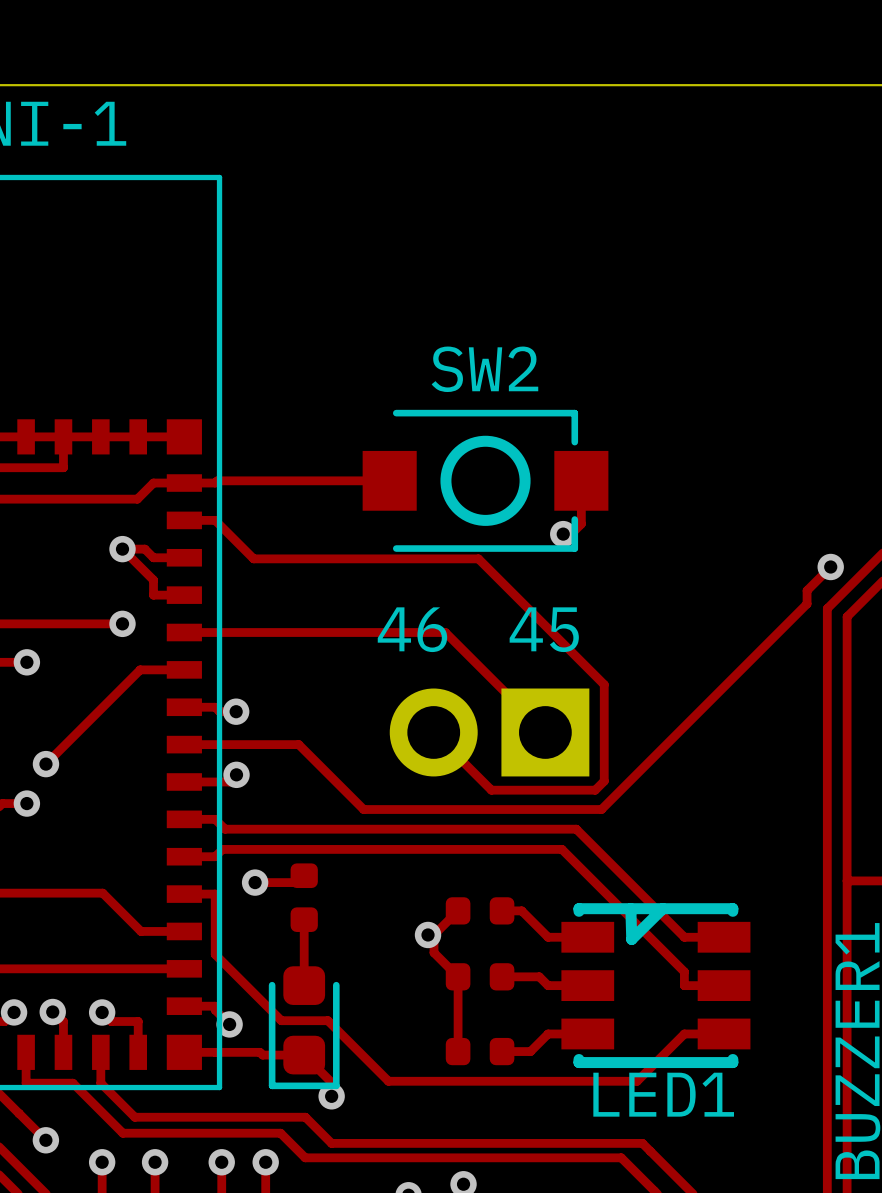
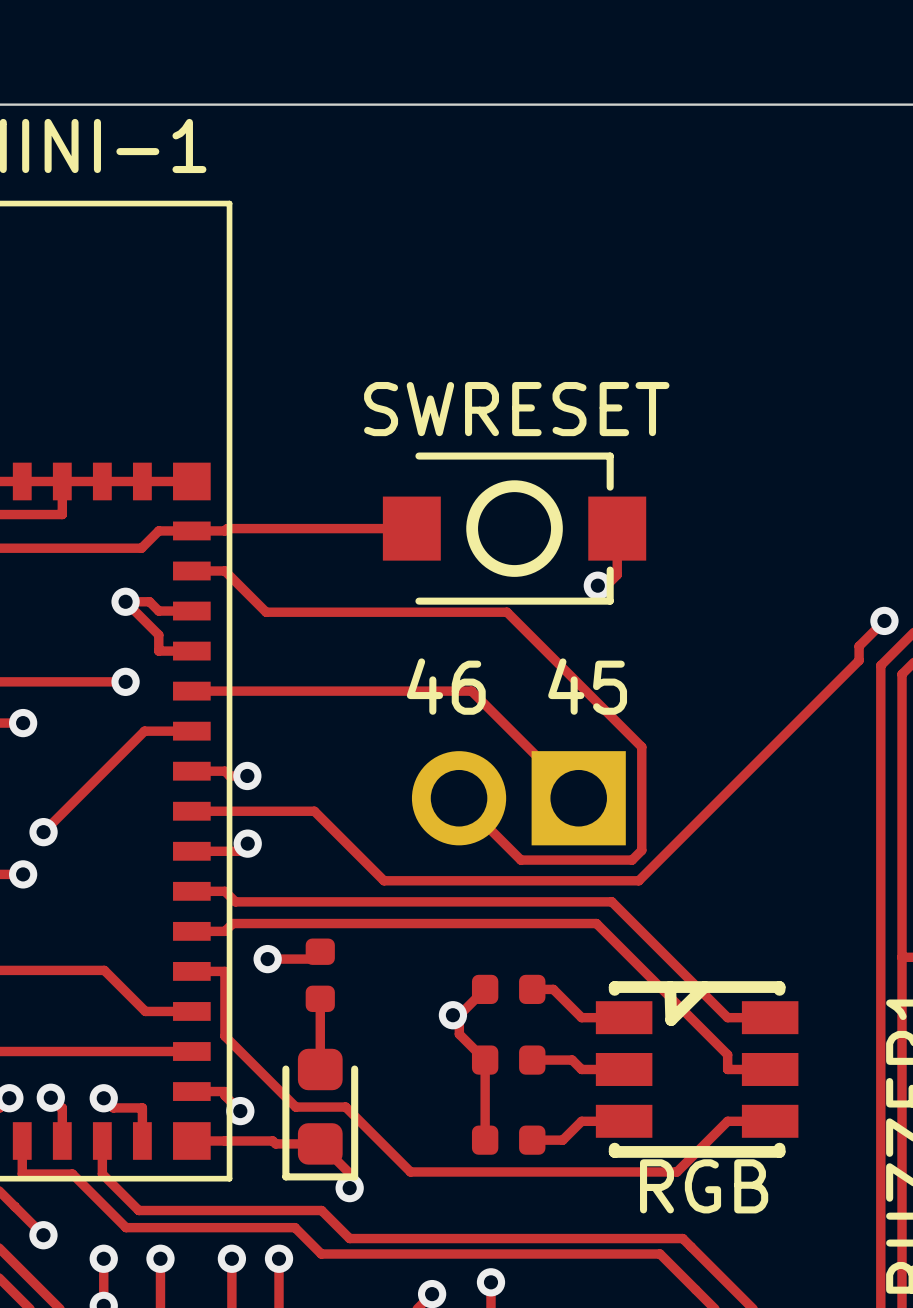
SW2 name: SW2 (484, 369) -> SWRESET (516, 409)
LED1 name: LED1 (663, 1094) -> RGB (704, 1186)

